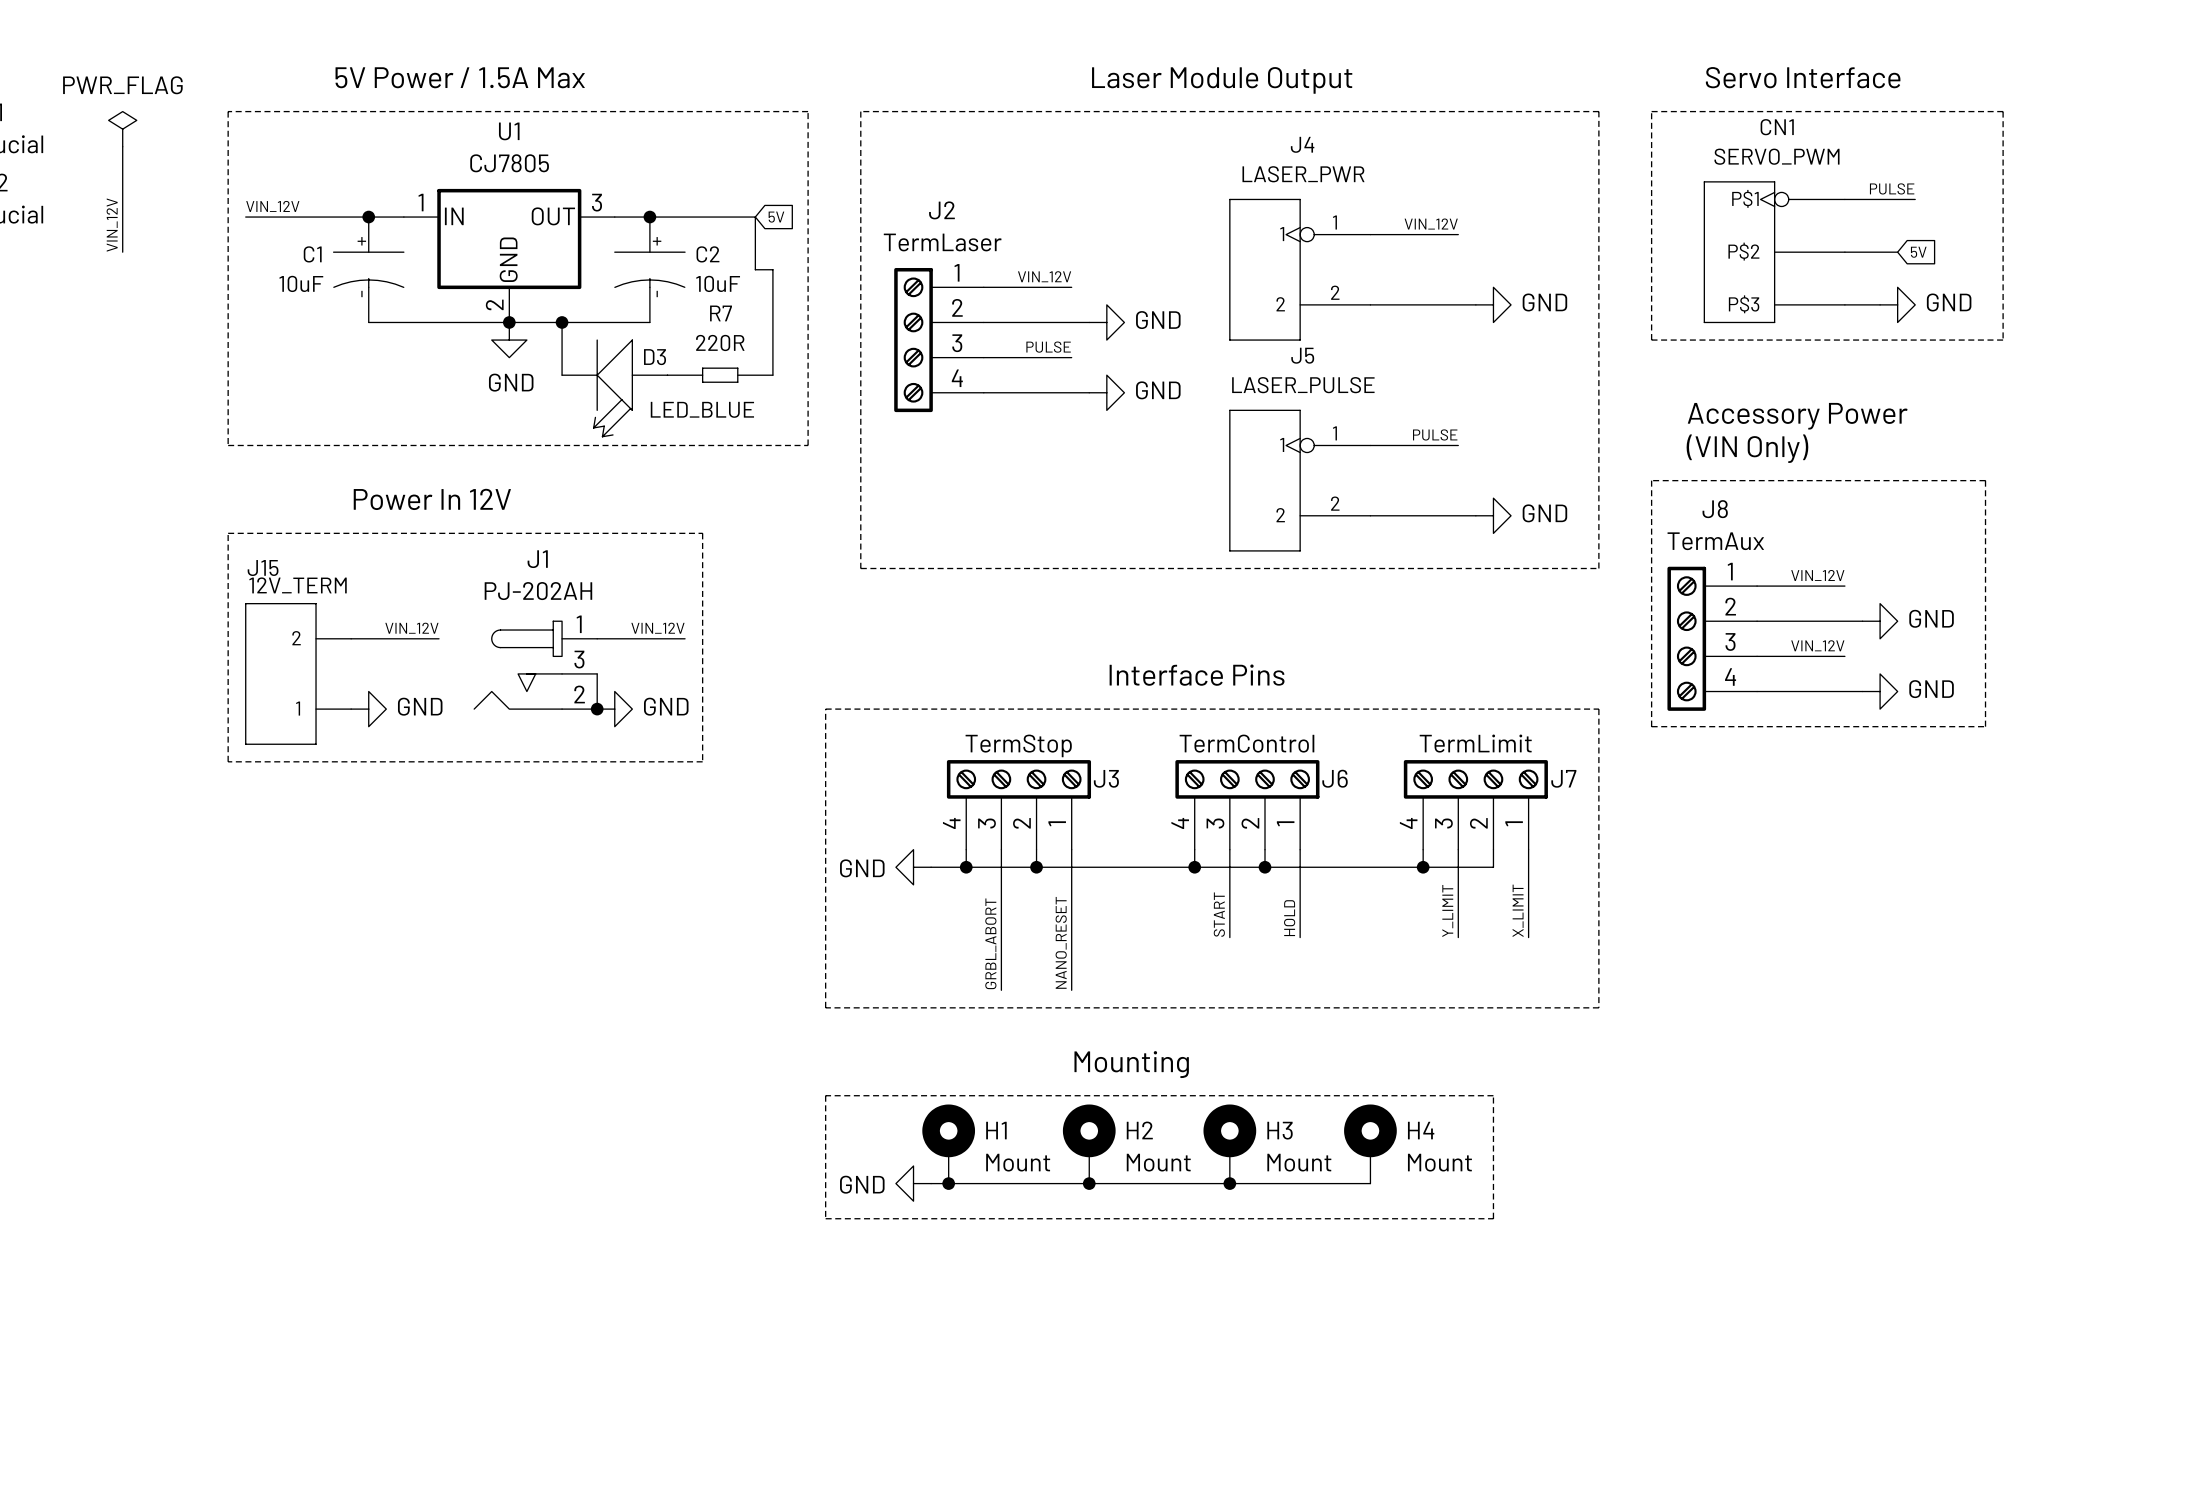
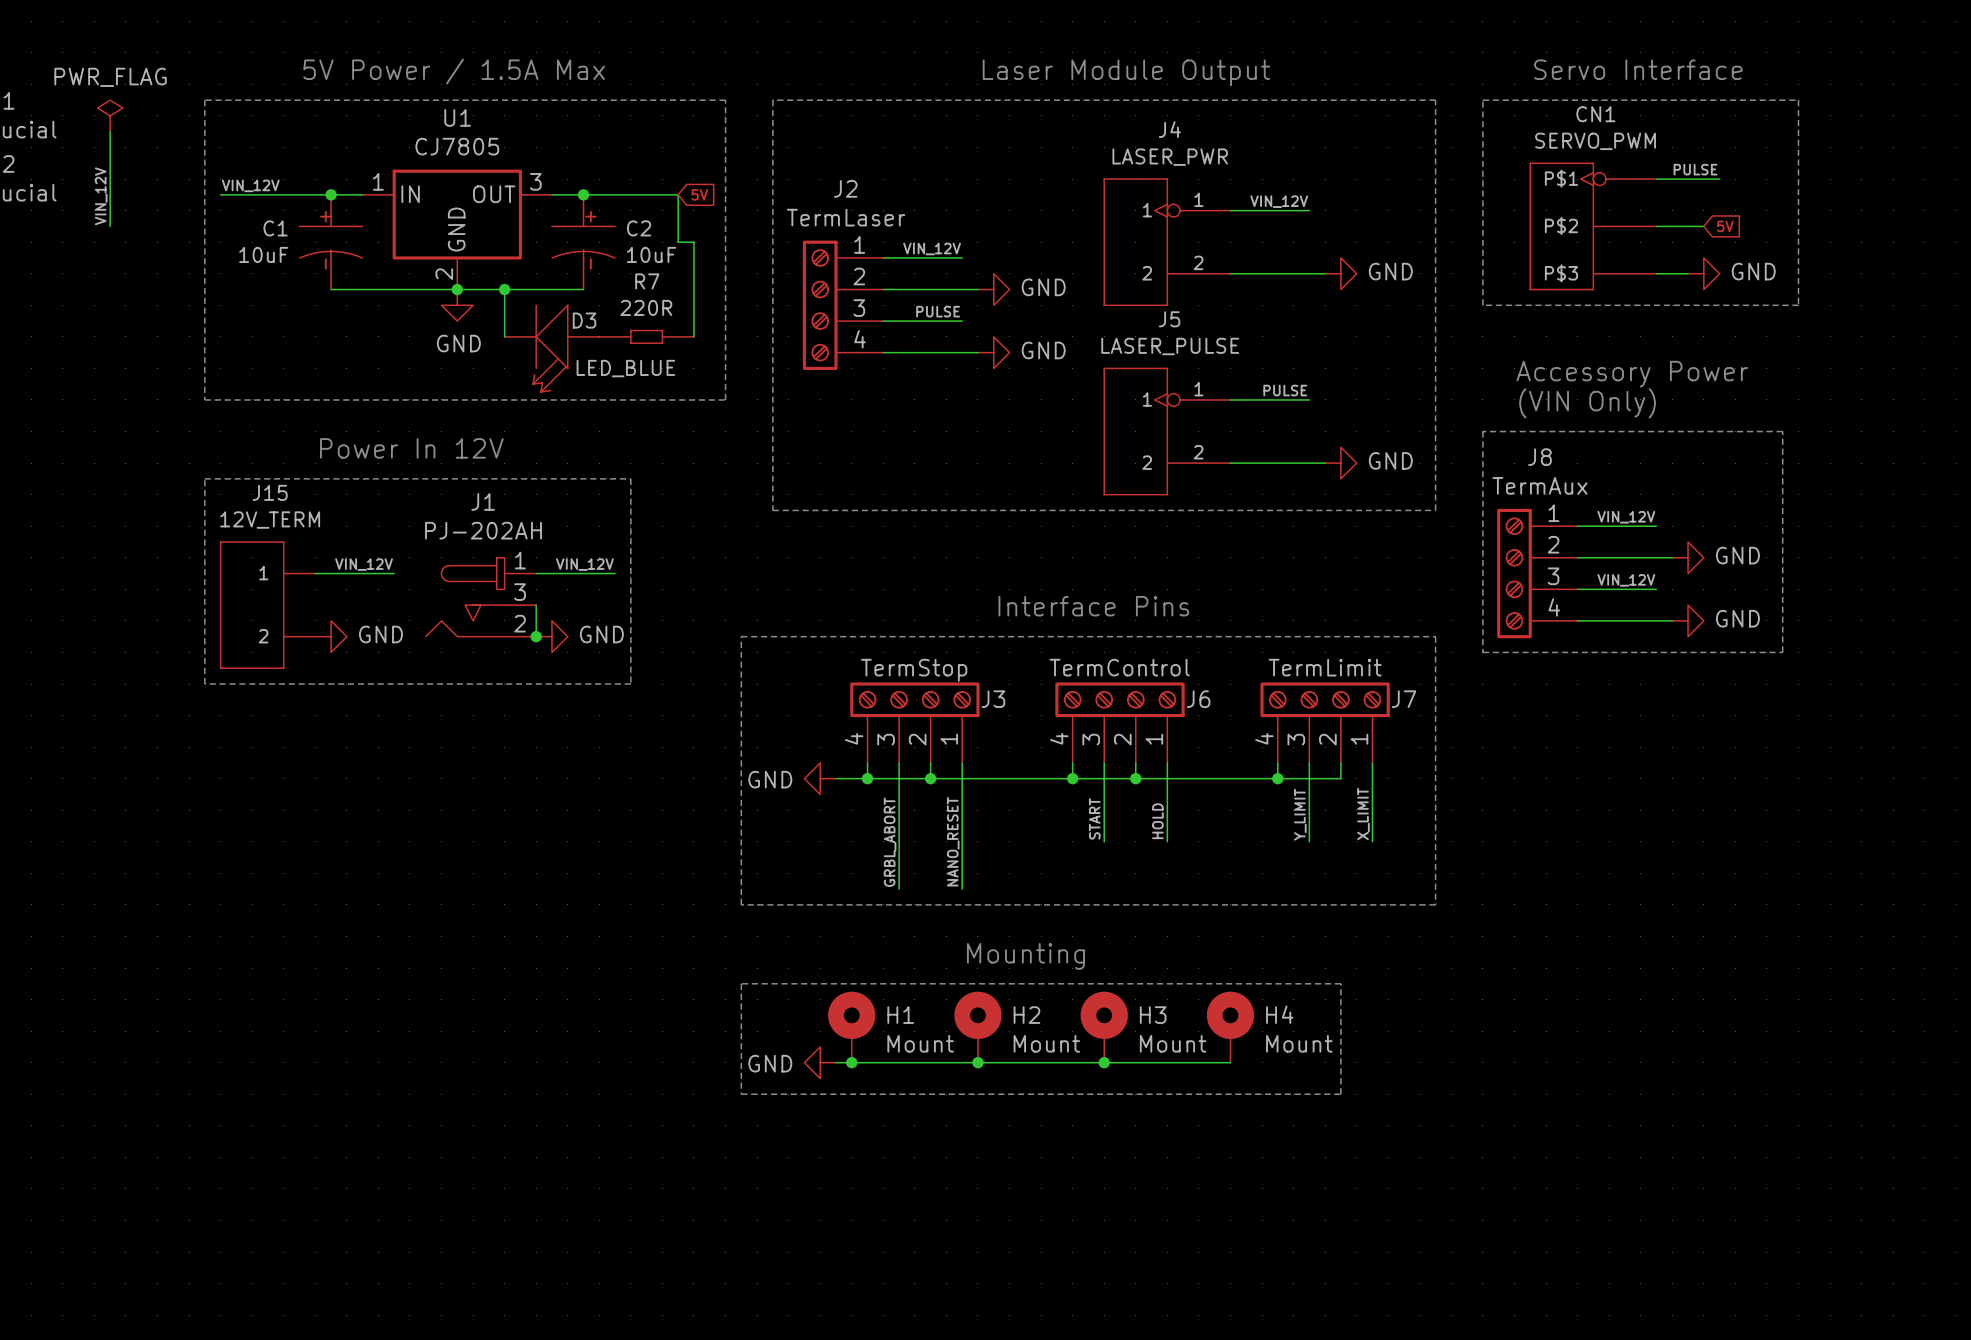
J15 name position: J15 (263, 568) -> J15 (270, 492)
J15 flip: as is (280, 673) -> up-down (252, 605)

